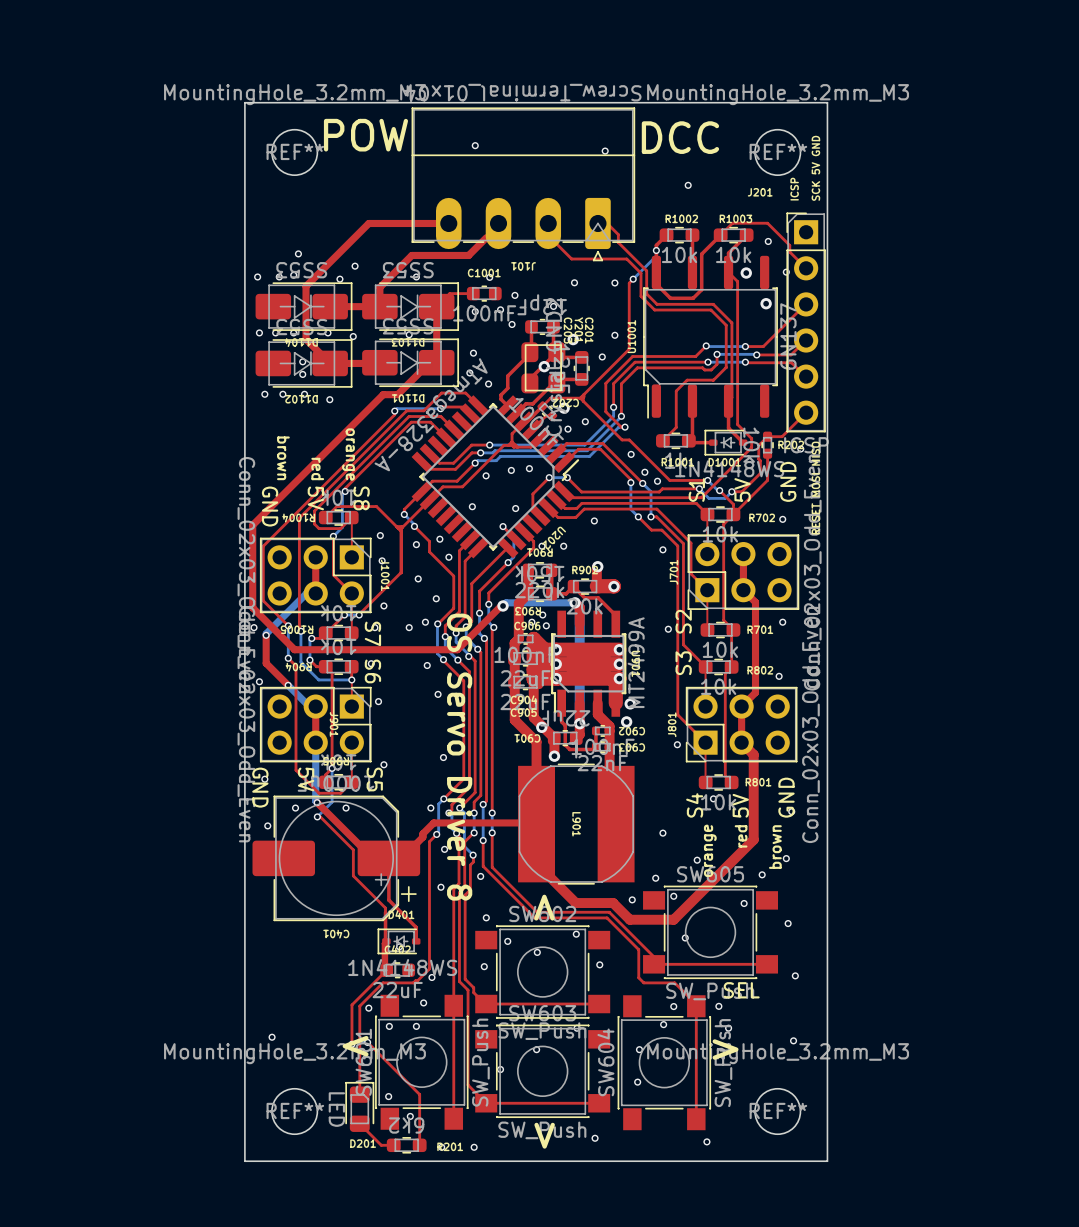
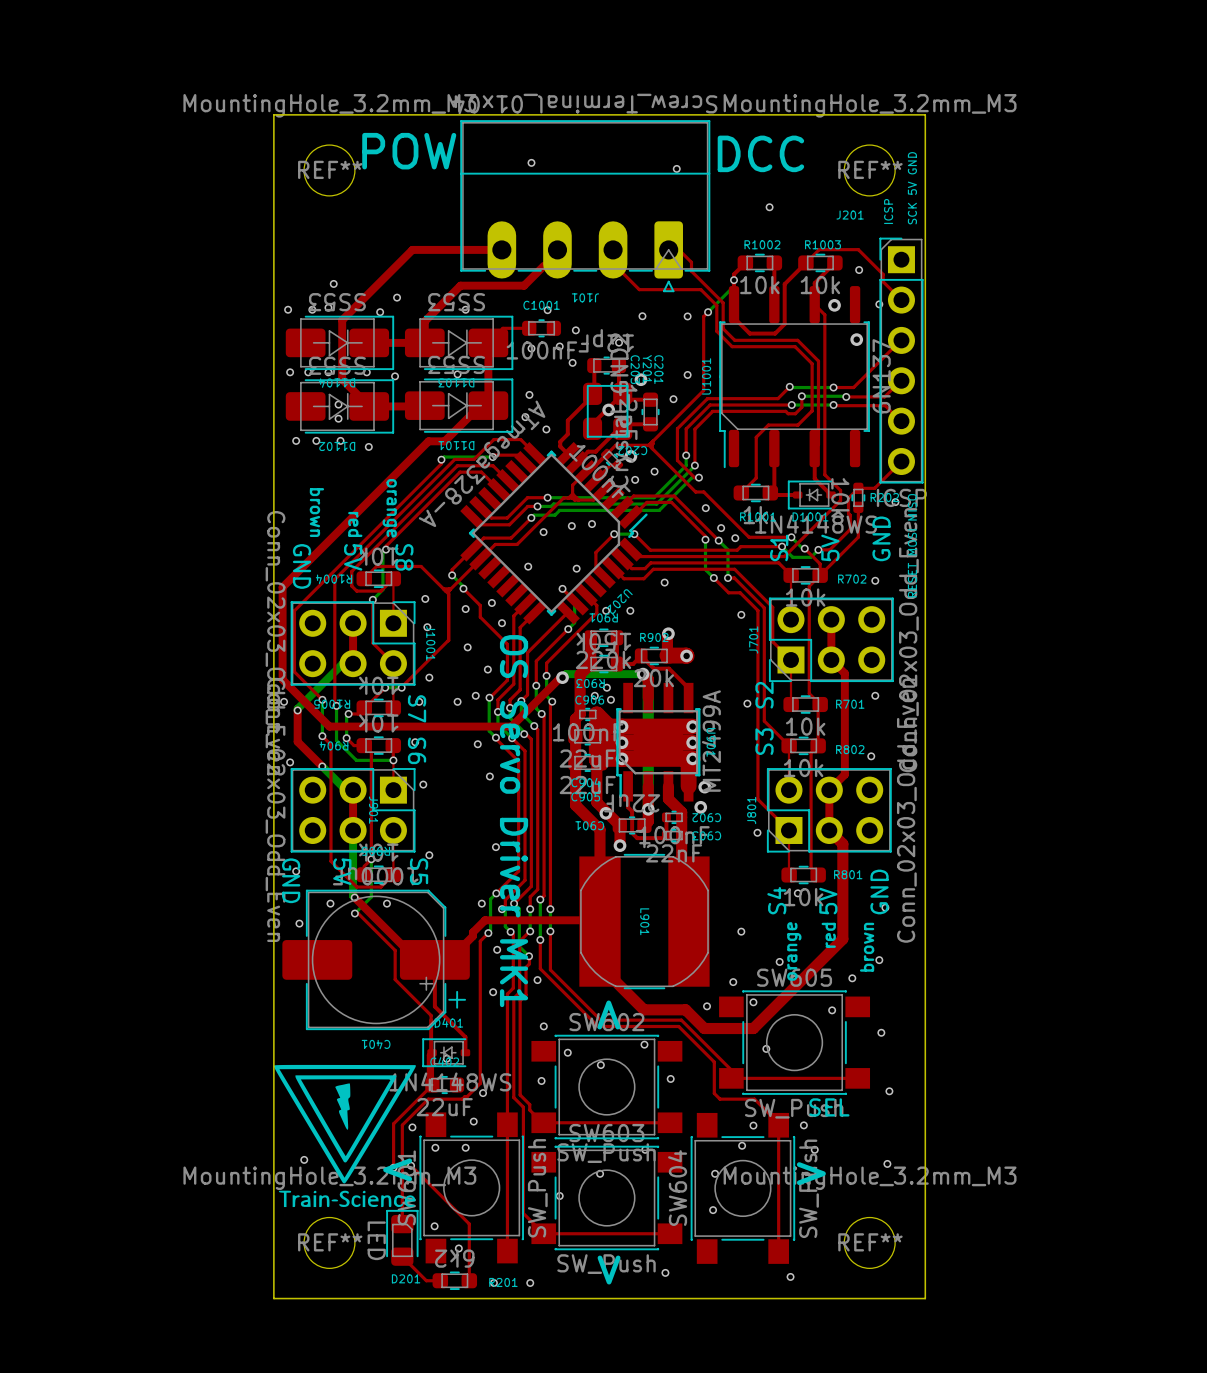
text: OS Servo Driver 8 (459, 757) -> OS Servo Driver MK1 (514, 821)
drawing: none -> [273, 1064, 416, 1208]

